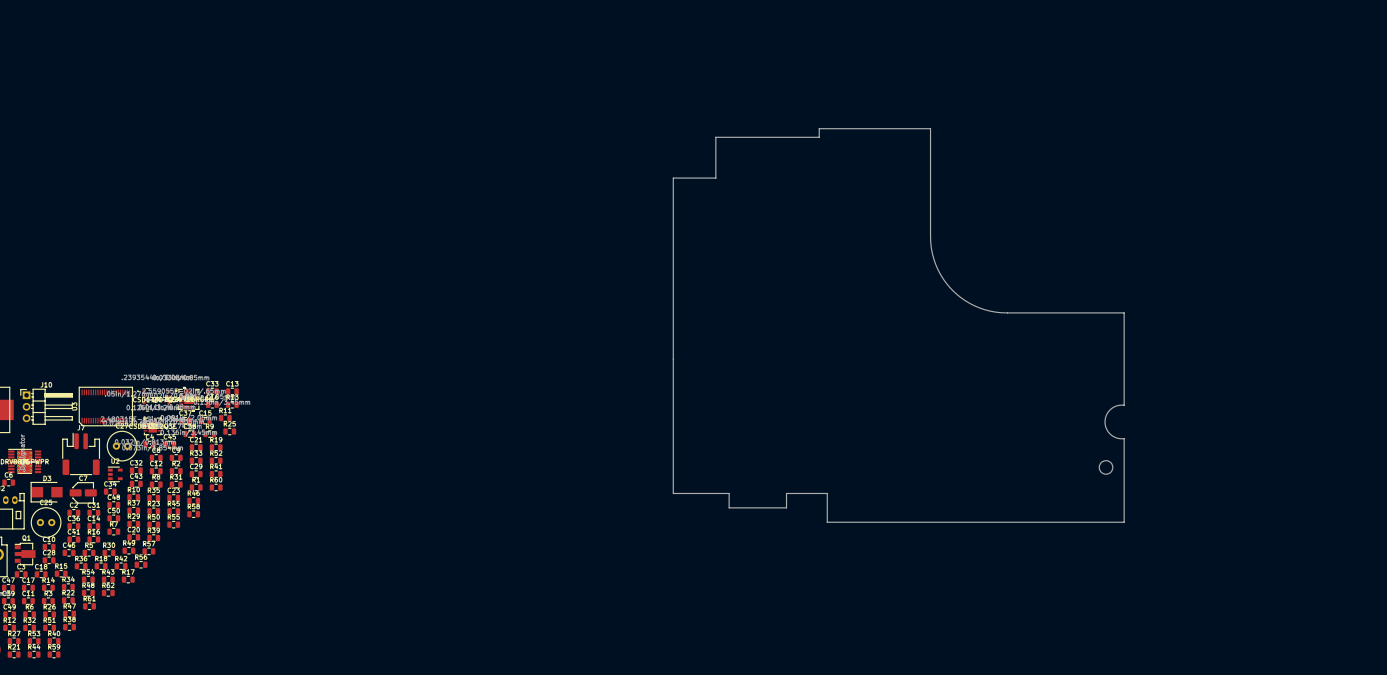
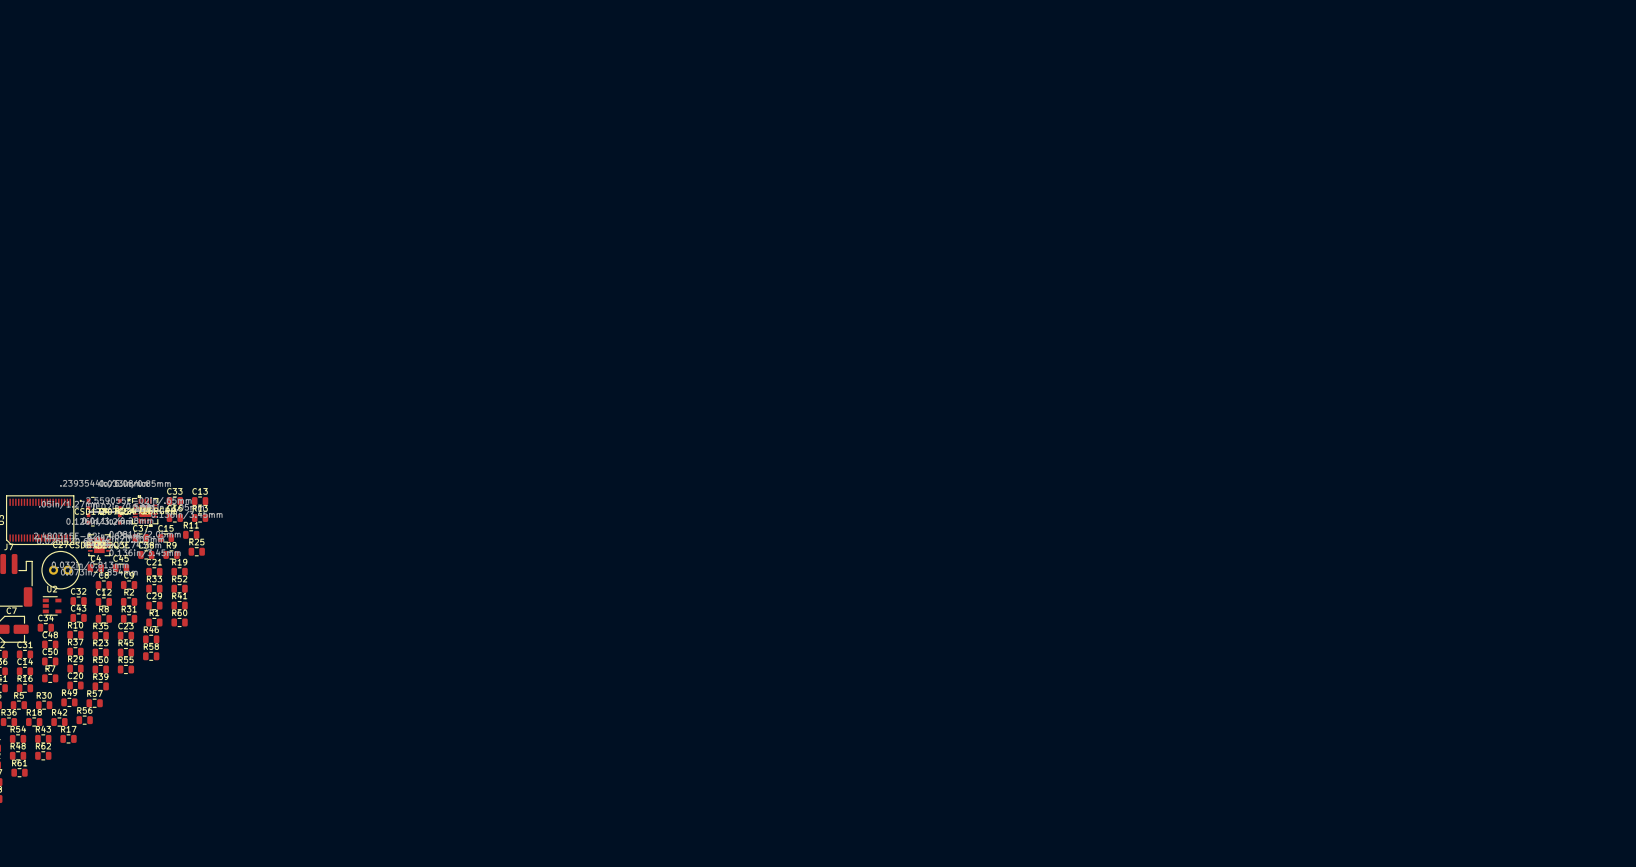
line: (819, 128) (930, 128) (931, 250) (935, 263) (944, 280) (956, 294) (967, 302) (984, 309) (1002, 312) (1124, 312) (1124, 405) (1110, 409) (1105, 421) (1110, 434) (1124, 438) (1124, 522) (827, 522) (827, 493) (786, 493) (786, 507) (729, 507) (729, 493) (673, 493) (673, 178) (715, 178) (715, 137) (819, 137) (819, 128) -> none
drawing: [1098, 460, 1114, 475] -> none

